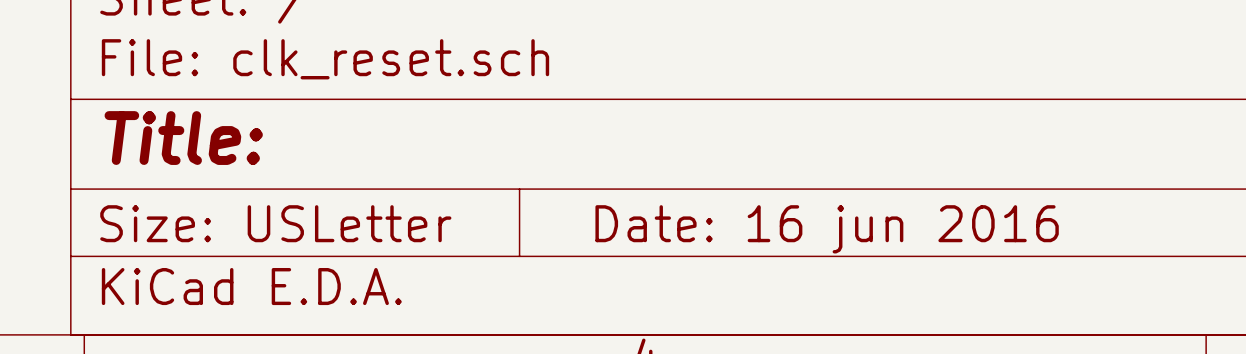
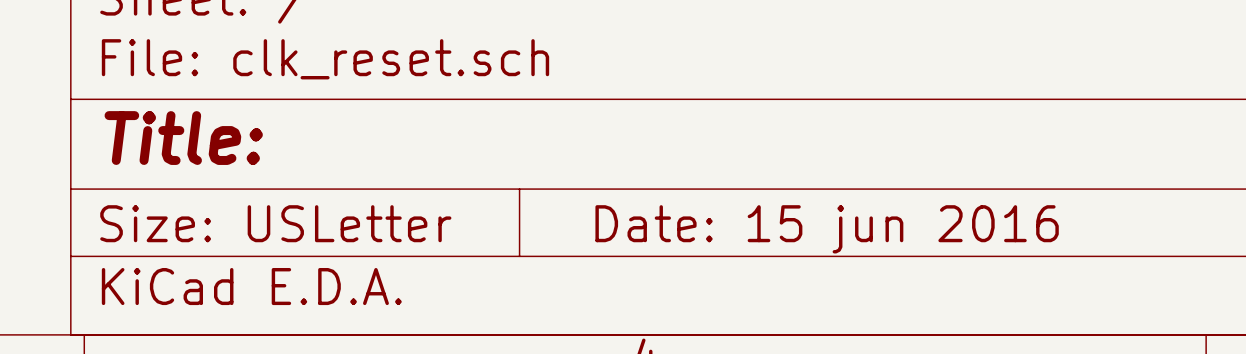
title block: Date: 16 jun 2016 (827, 229) -> Date: 15 jun 2016 (827, 229)

